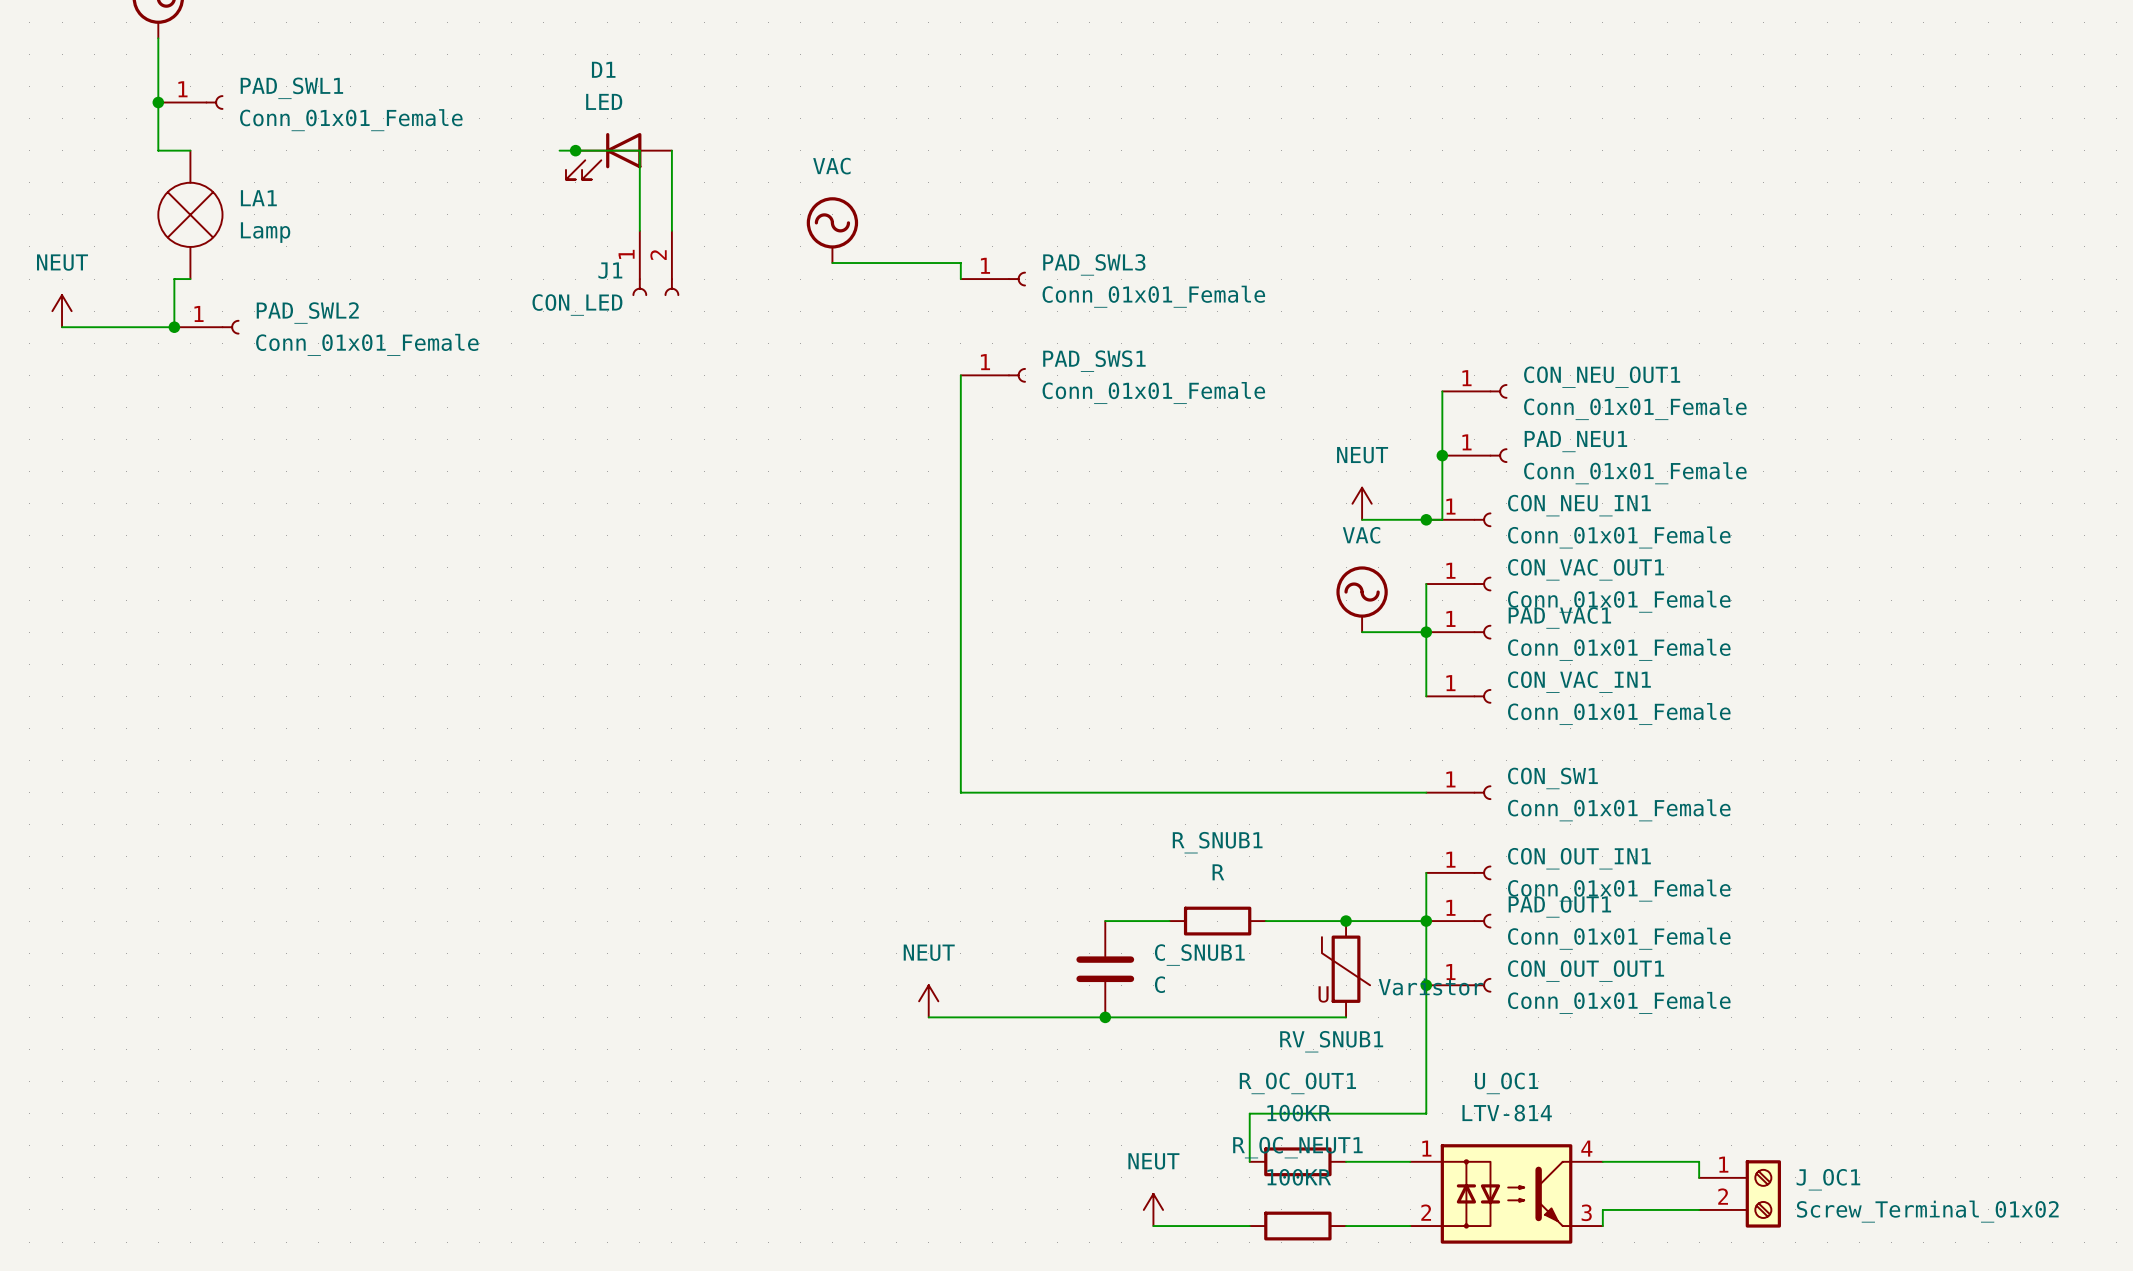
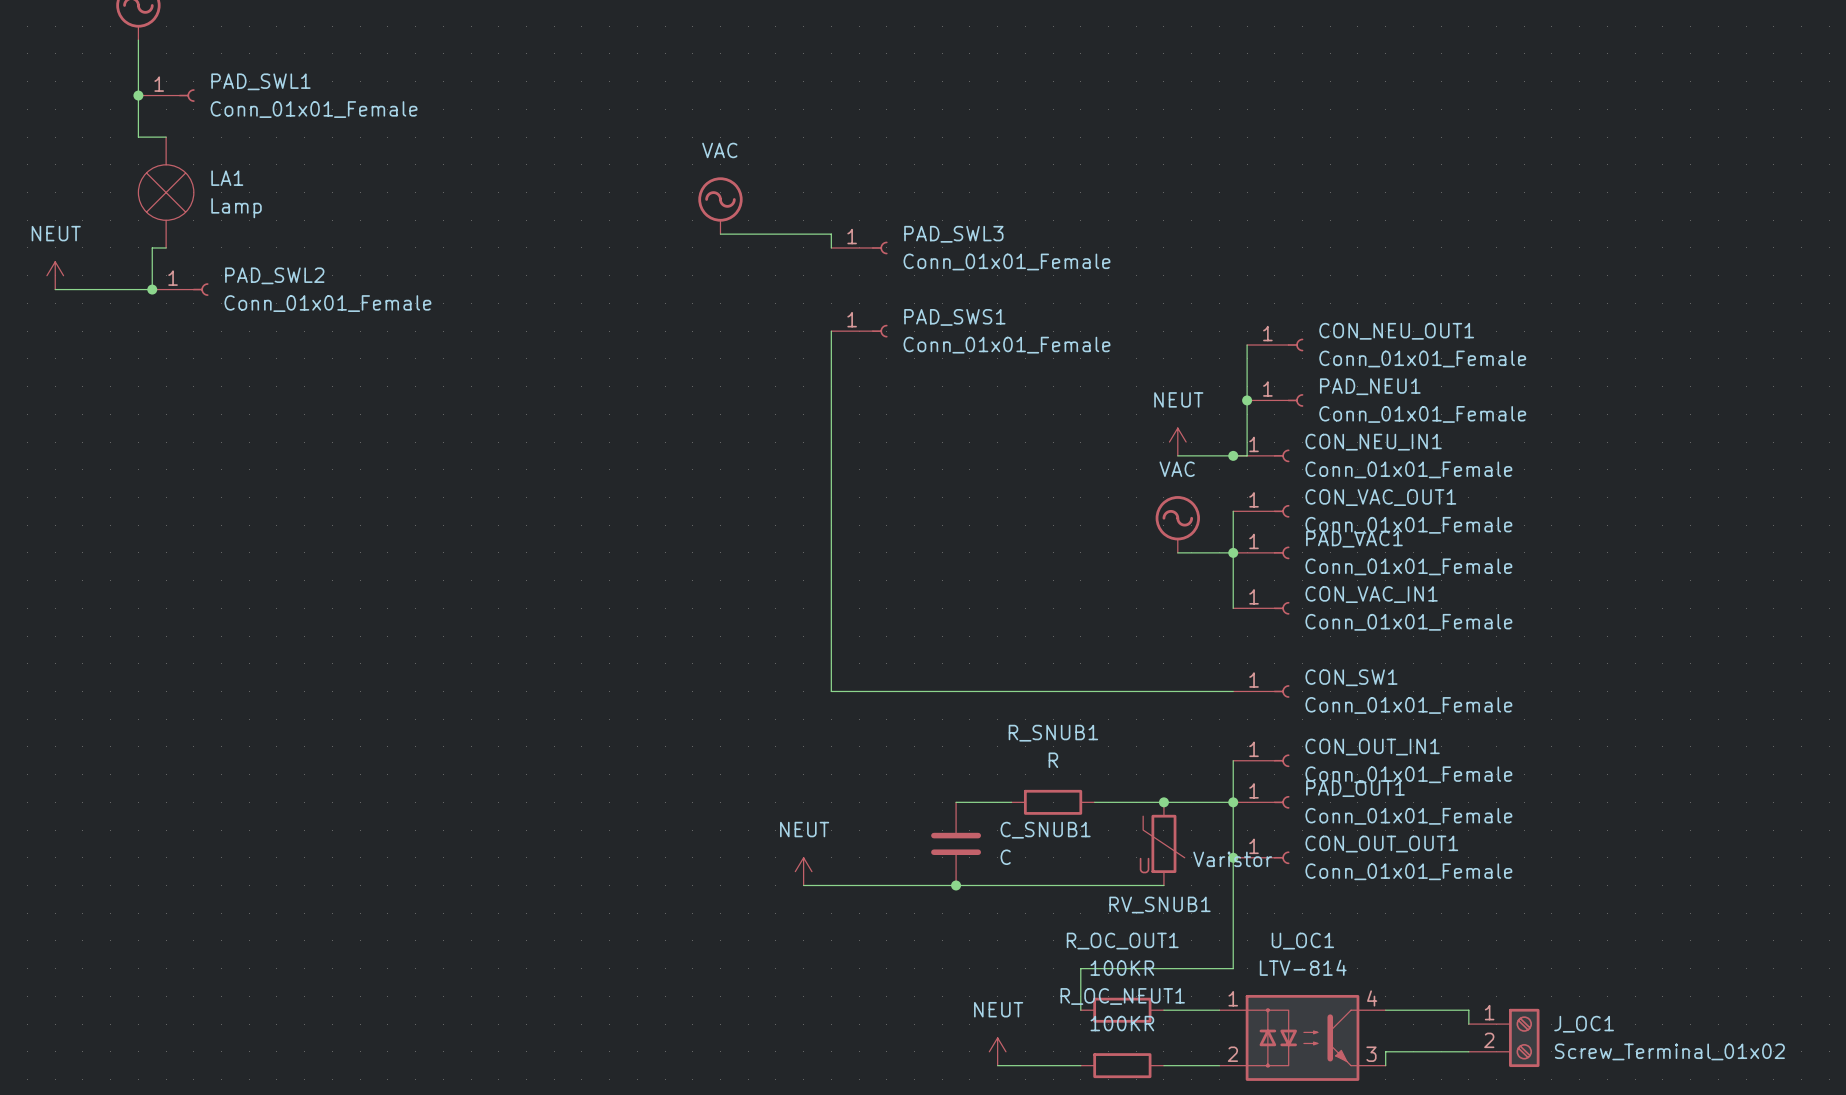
wire: (559, 150) (639, 150) (639, 230) -> none
junction: (575, 150) -> none
wire: (671, 150) (671, 230) -> none
D1: LED (618, 156) -> none
J1: CON_LED (655, 263) -> none

